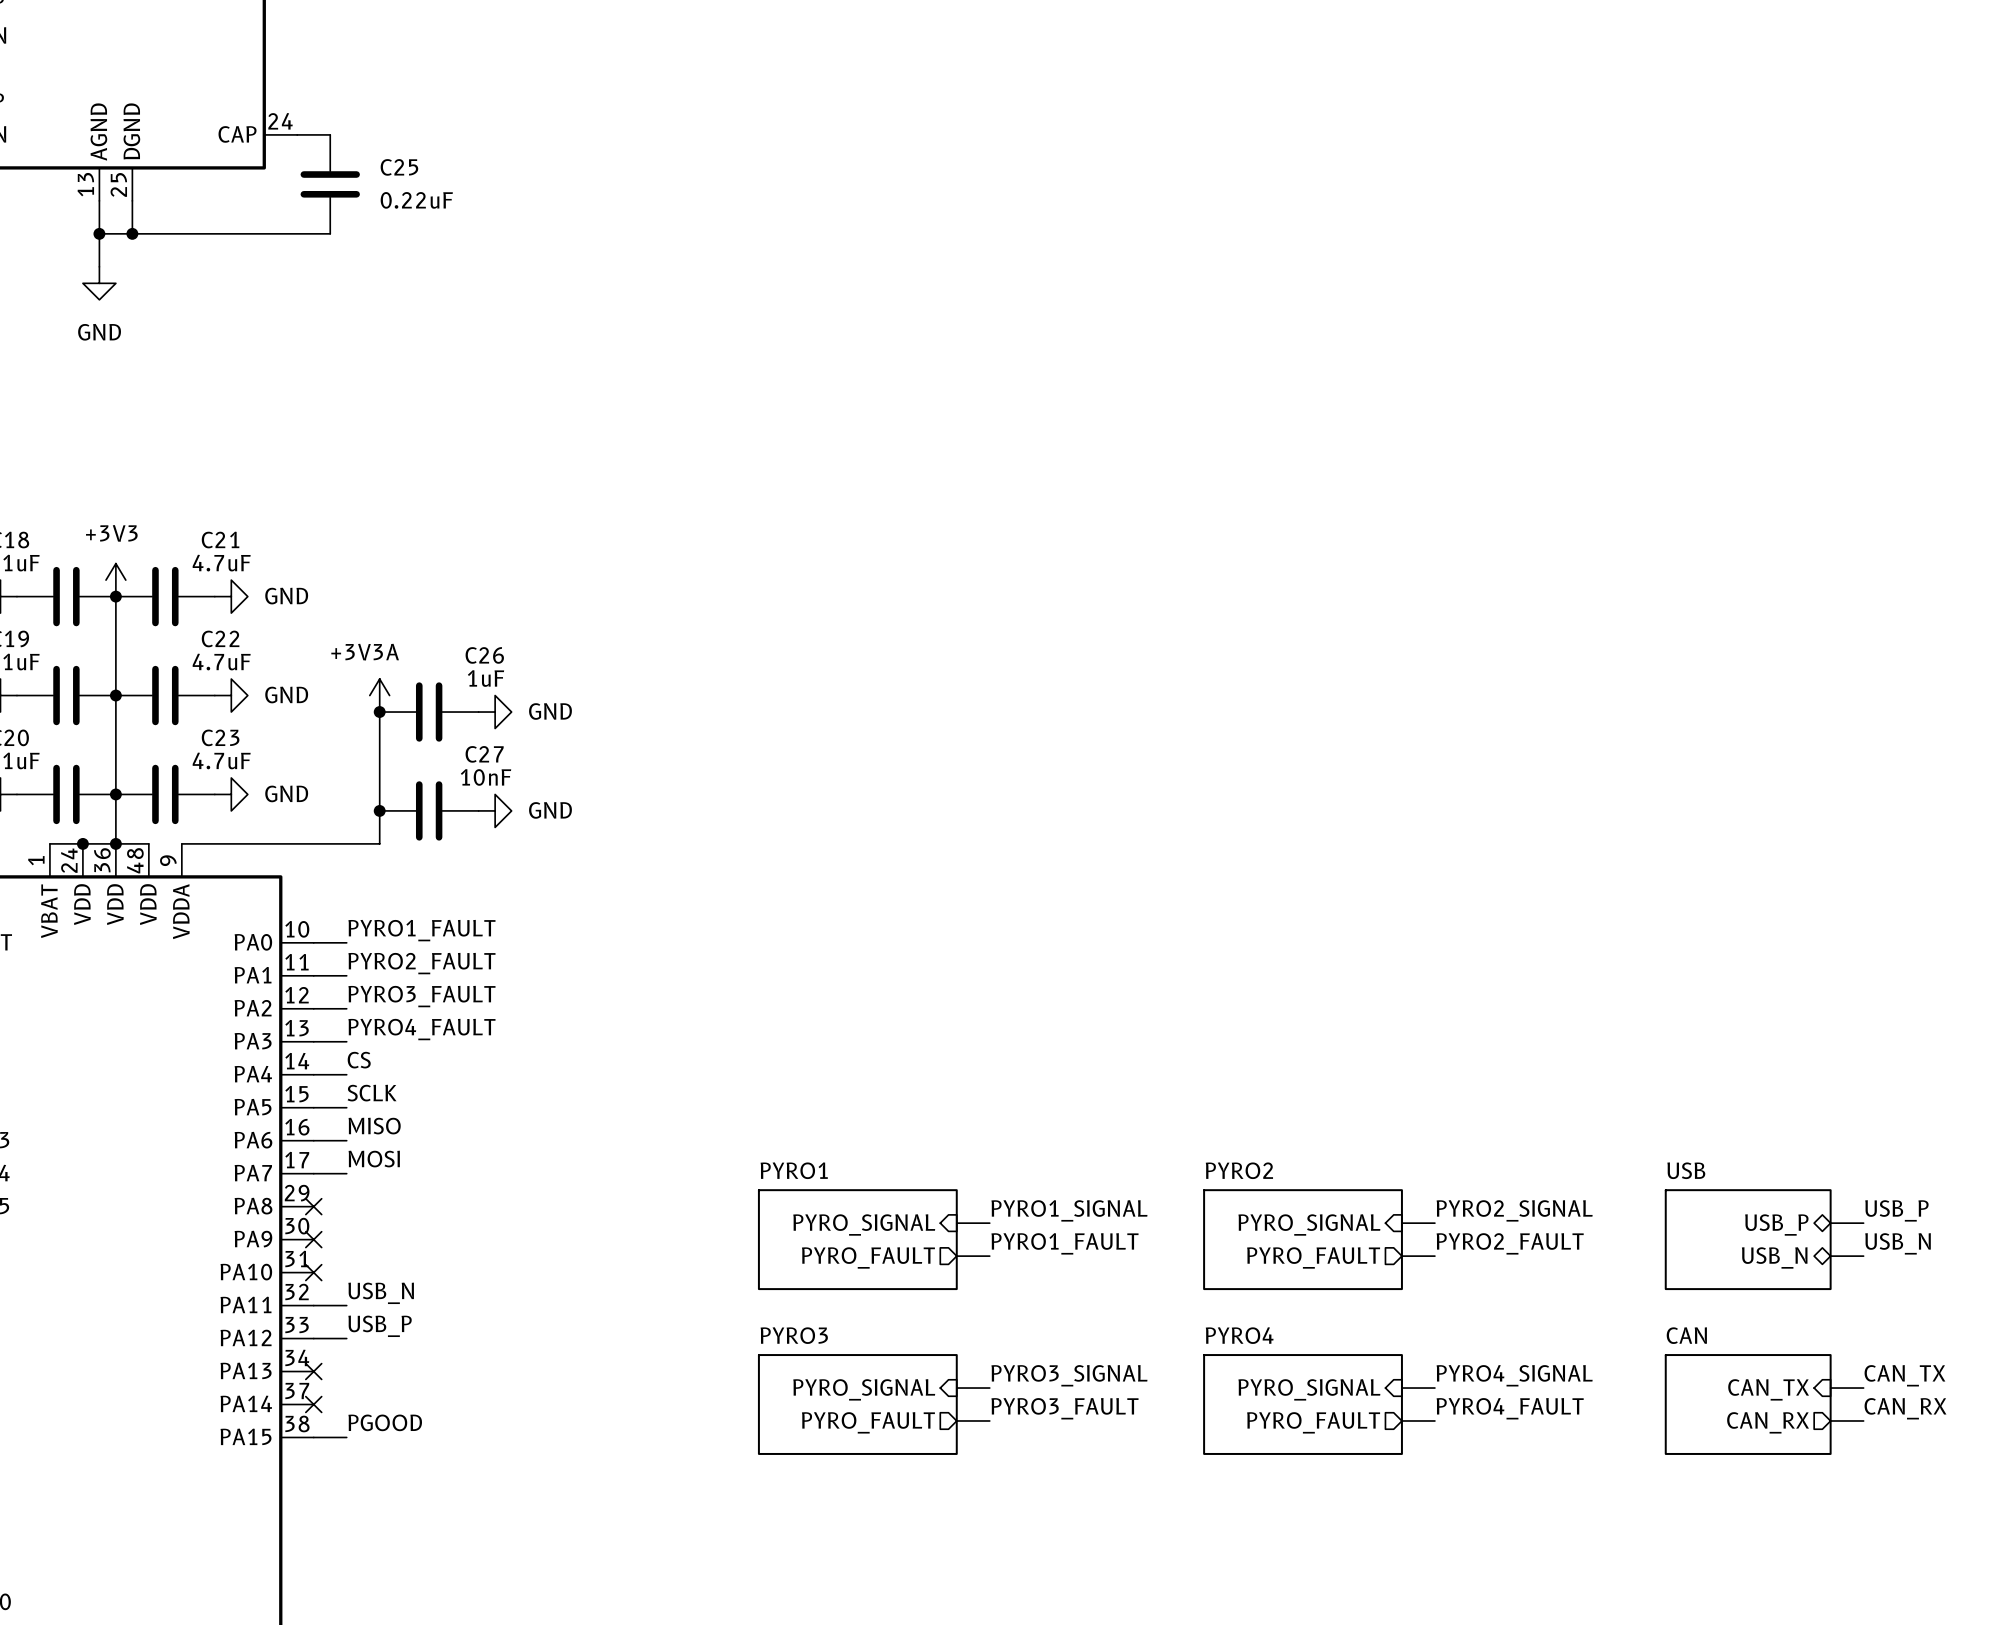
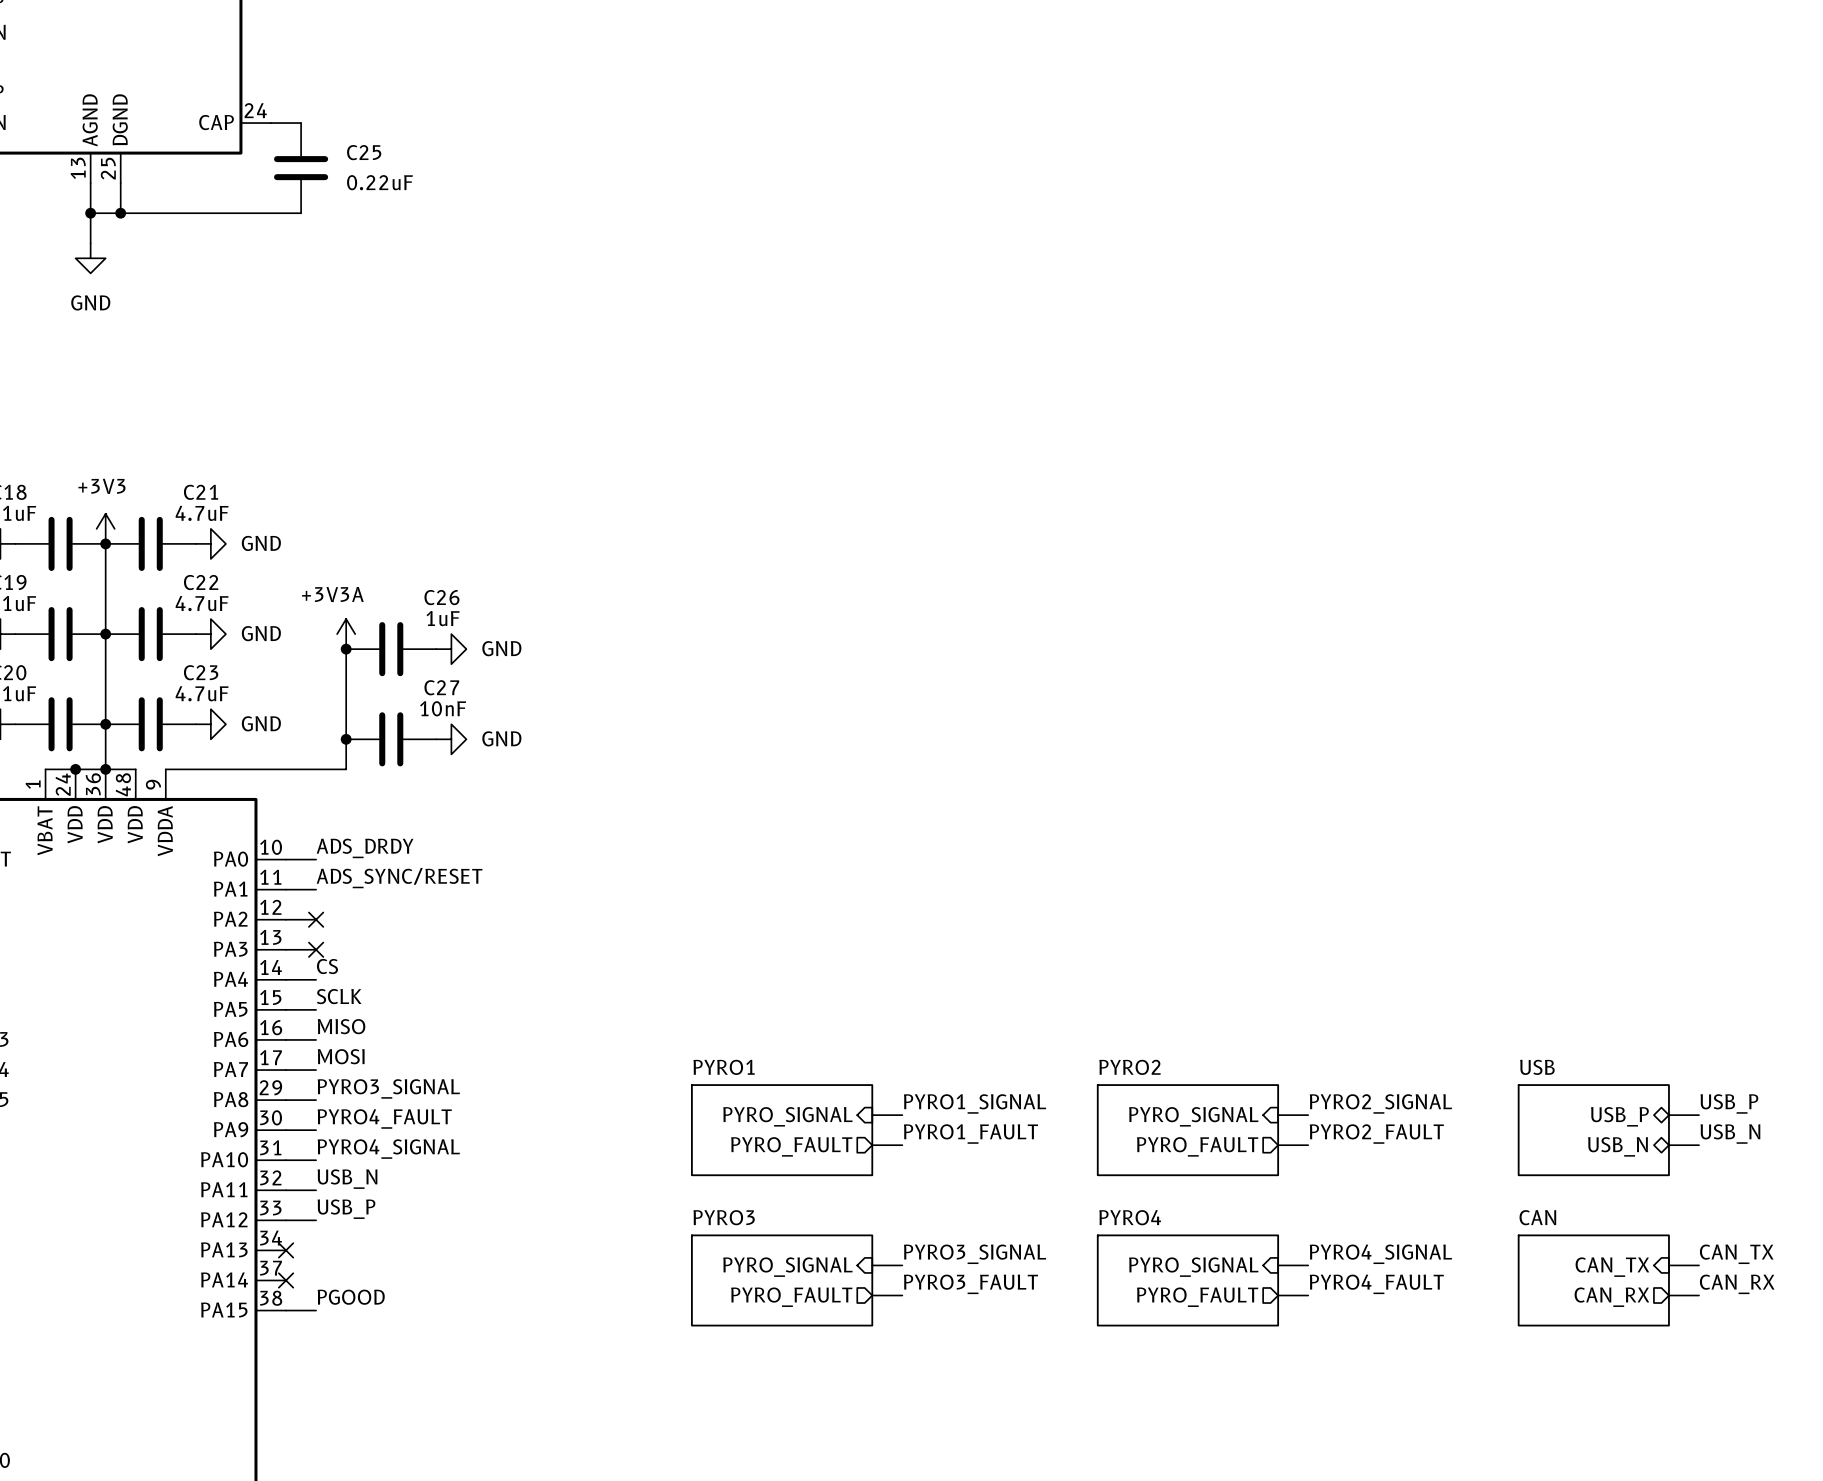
label: PYRO1_FAULT (421, 930) -> ADS_DRDY (365, 848)
label: PYRO2_FAULT (421, 963) -> ADS_SYNC/RESET (399, 878)
label: PYRO3_FAULT (421, 996) -> none
no-connect mark: none -> (316, 919)
label position: PYRO4_FAULT (421, 1029) -> PYRO4_FAULT (384, 1118)
no-connect mark: none -> (316, 949)
label: none -> PYRO3_SIGNAL (388, 1088)
wire: none -> (286, 1100) (316, 1100)
no-connect mark: (313, 1206) -> none
wire: none -> (286, 1130) (316, 1130)
no-connect mark: (313, 1239) -> none
label: none -> PYRO4_SIGNAL (388, 1149)
wire: none -> (286, 1160) (316, 1160)
no-connect mark: (313, 1272) -> none

